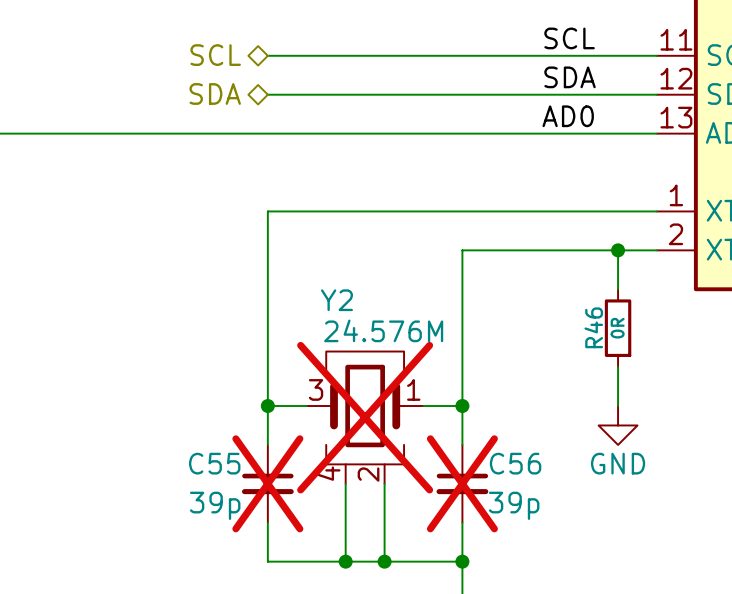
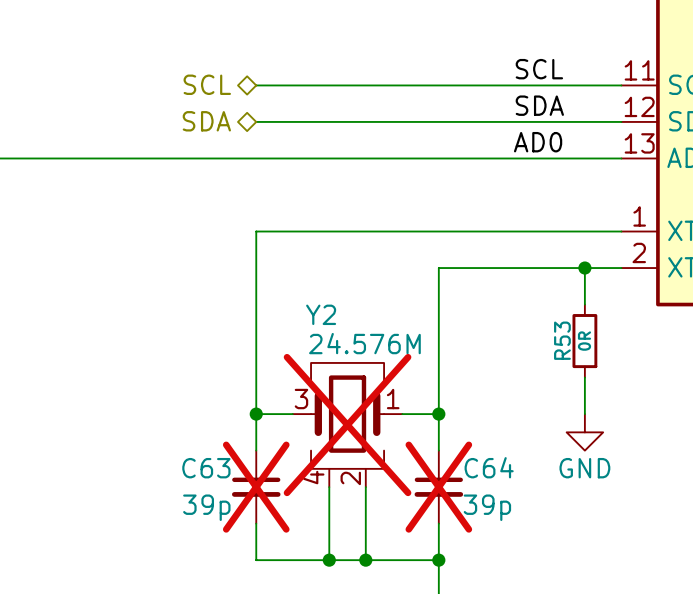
R46 name: R46 (593, 327) -> R53 (562, 340)
C55 name: C55 (214, 463) -> C63 (206, 468)
C56 name: C56 (515, 463) -> C64 (489, 467)

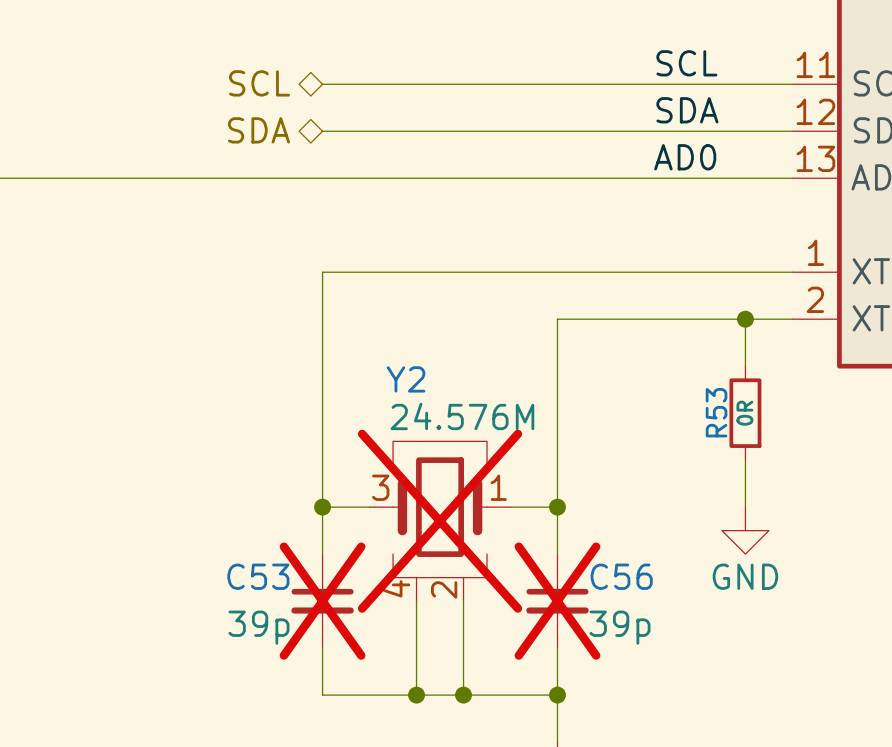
C64 name: C64 (489, 467) -> C56 (621, 576)
C63 name: C63 (206, 468) -> C53 (258, 576)

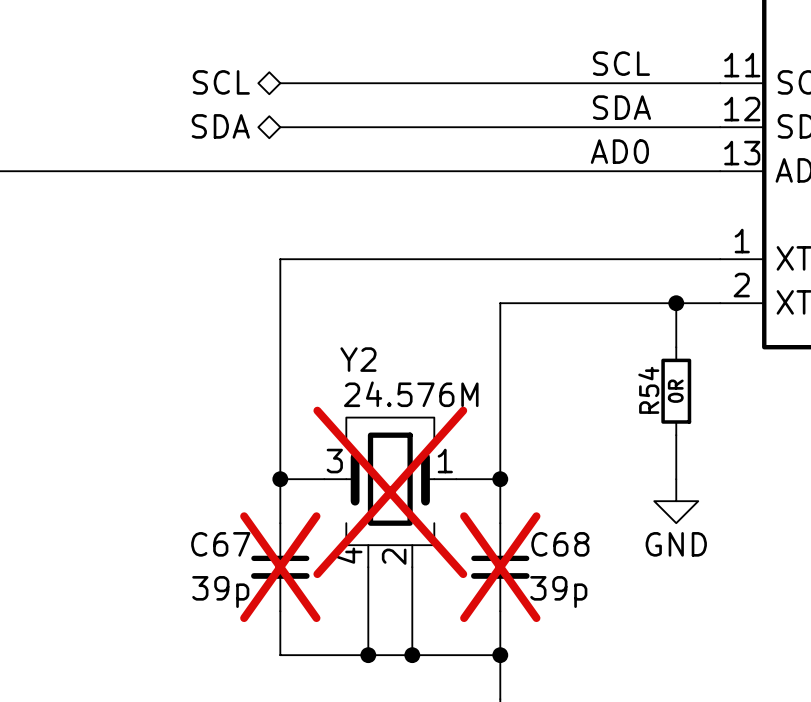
R53 name: R53 (716, 412) -> R54 (648, 390)
C53 name: C53 (258, 576) -> C67 (220, 544)
C56 name: C56 (621, 576) -> C68 (560, 544)

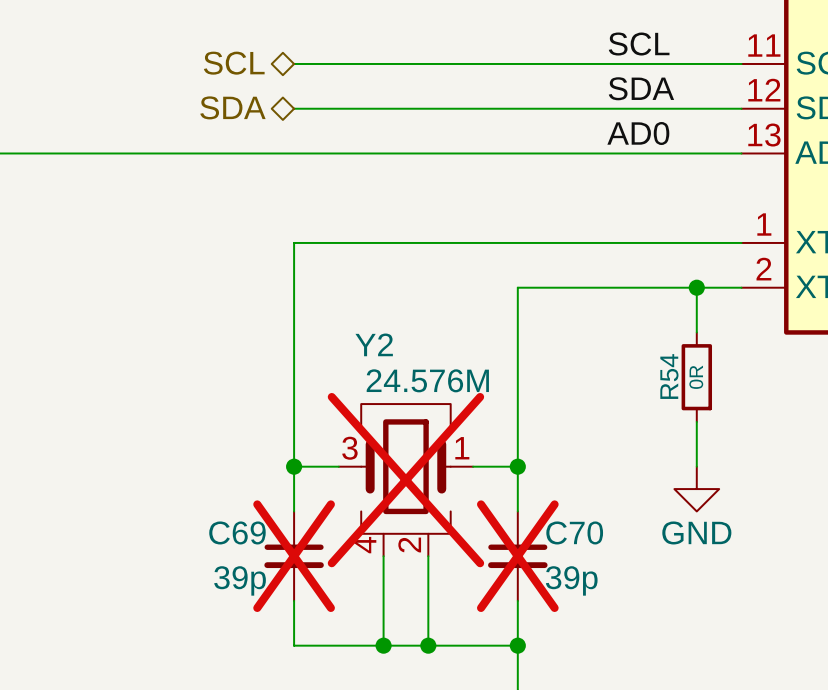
C67 name: C67 (220, 544) -> C69 (237, 532)
C68 name: C68 (560, 544) -> C70 (574, 532)

